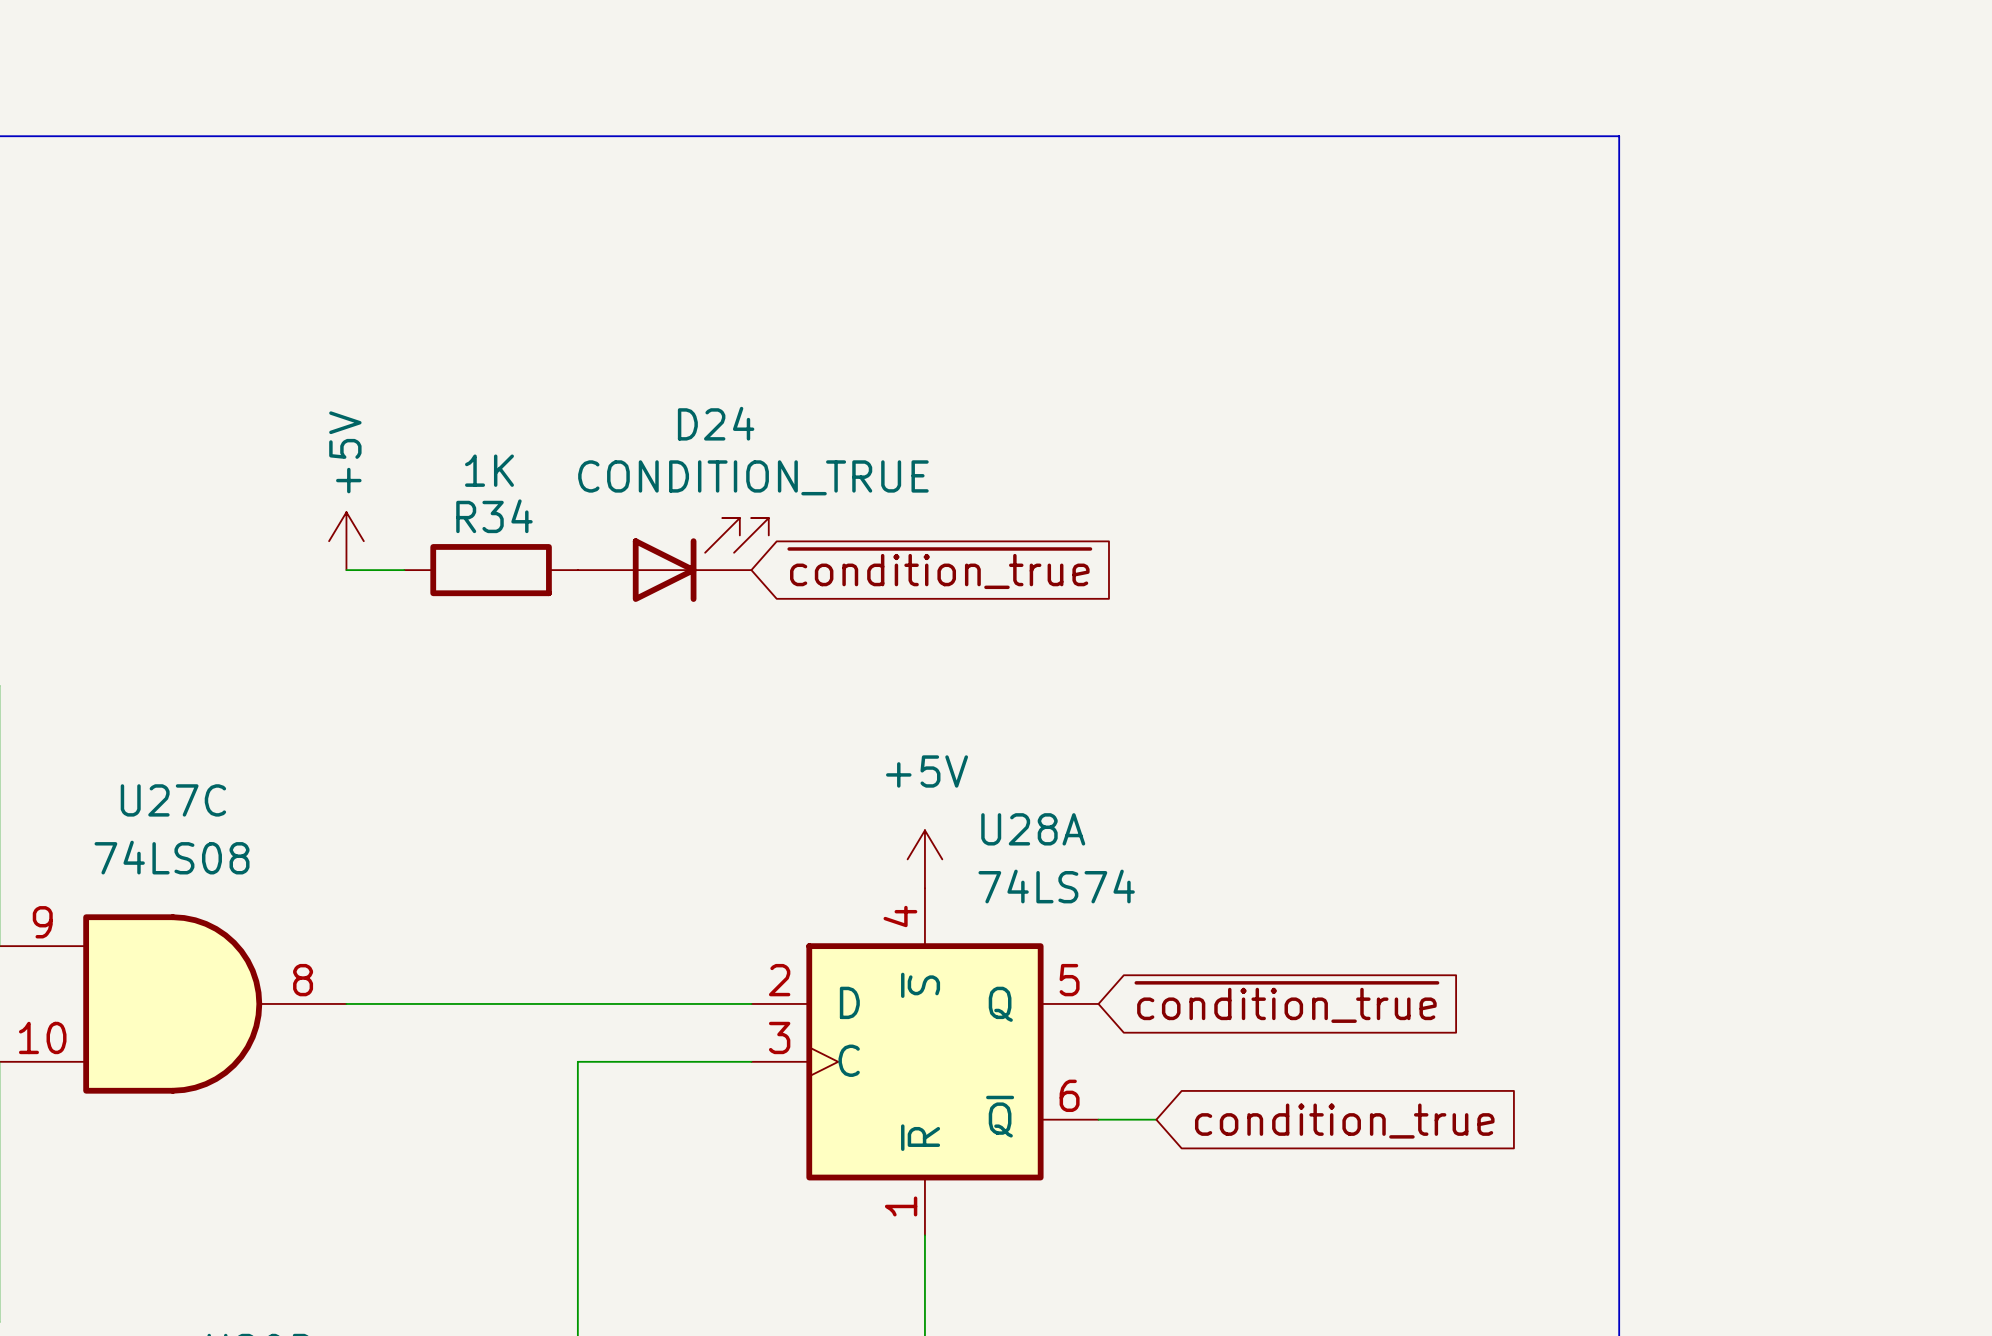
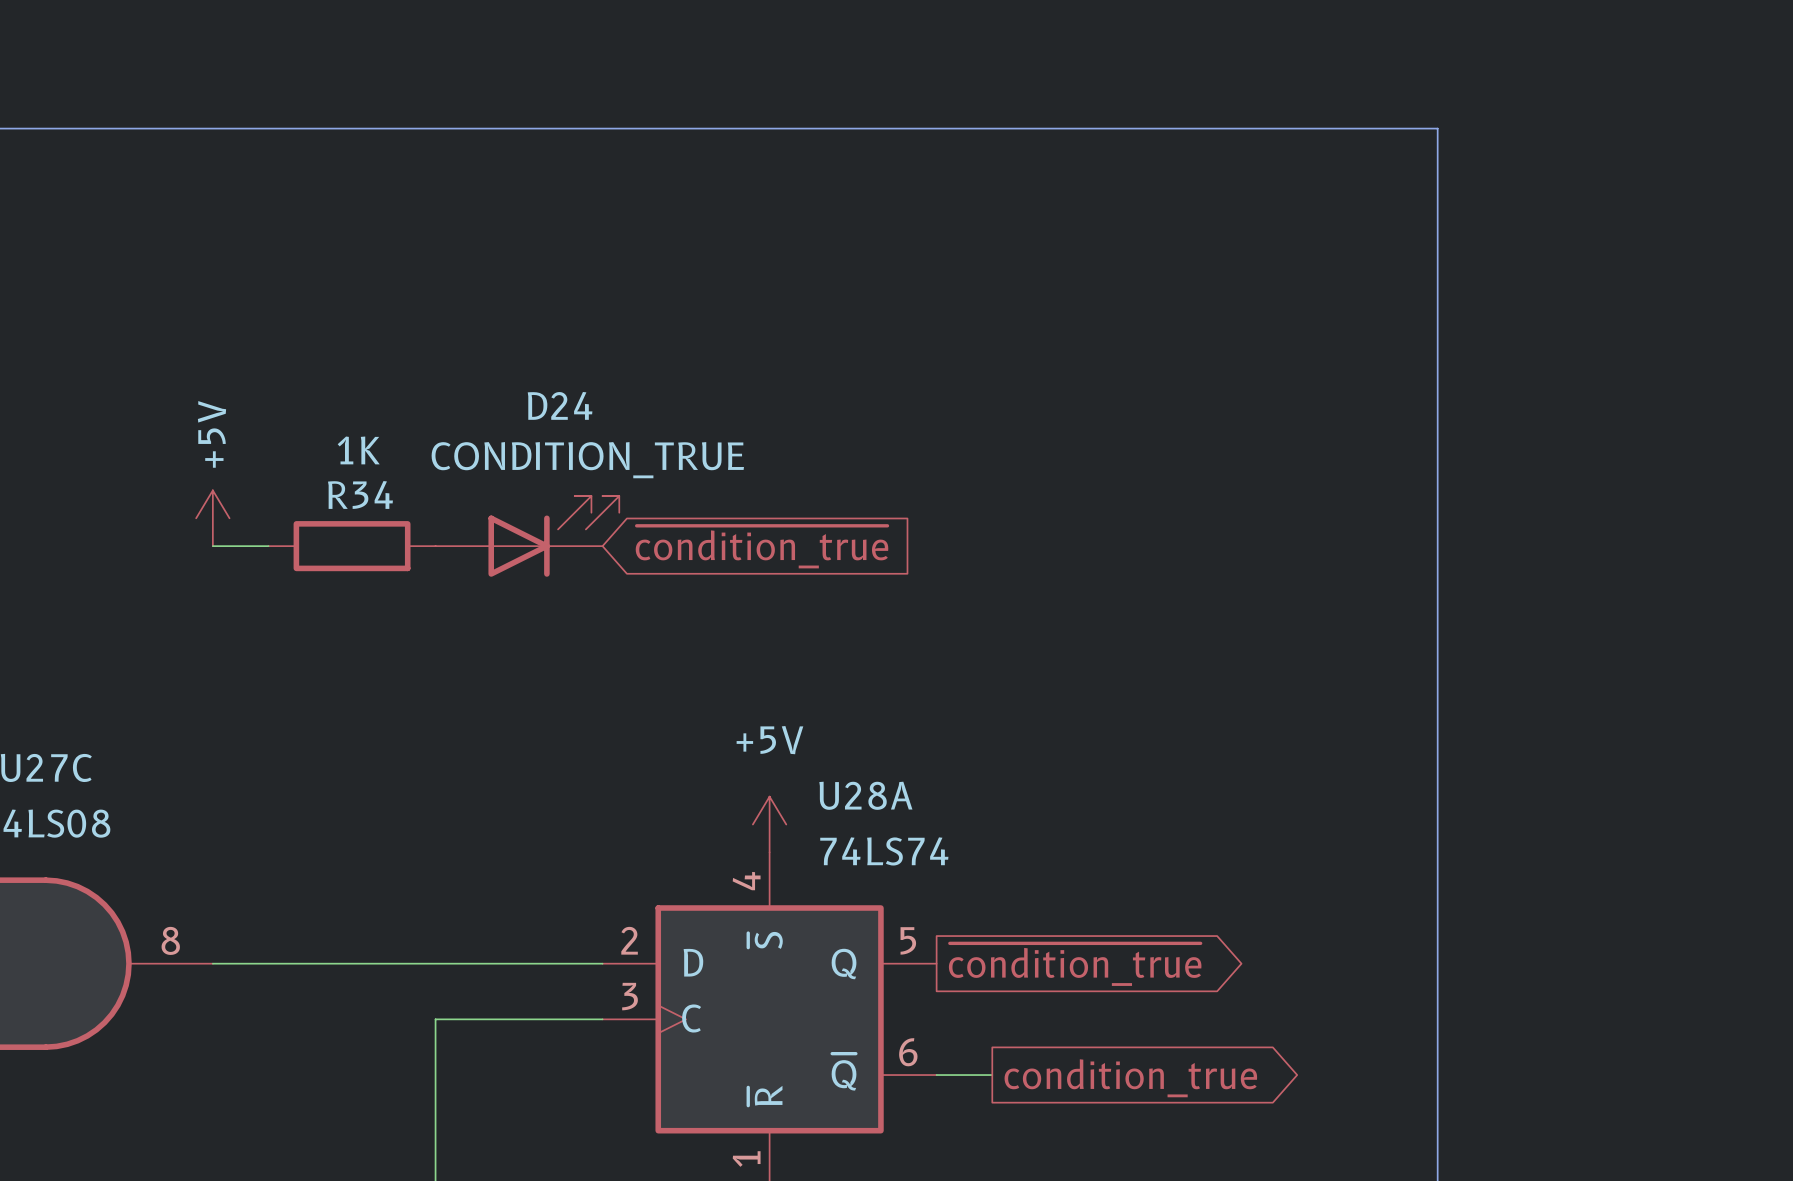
global label shape: input (1286, 1002) -> output (1075, 964)
global label shape: input (1344, 1121) -> output (1130, 1078)

